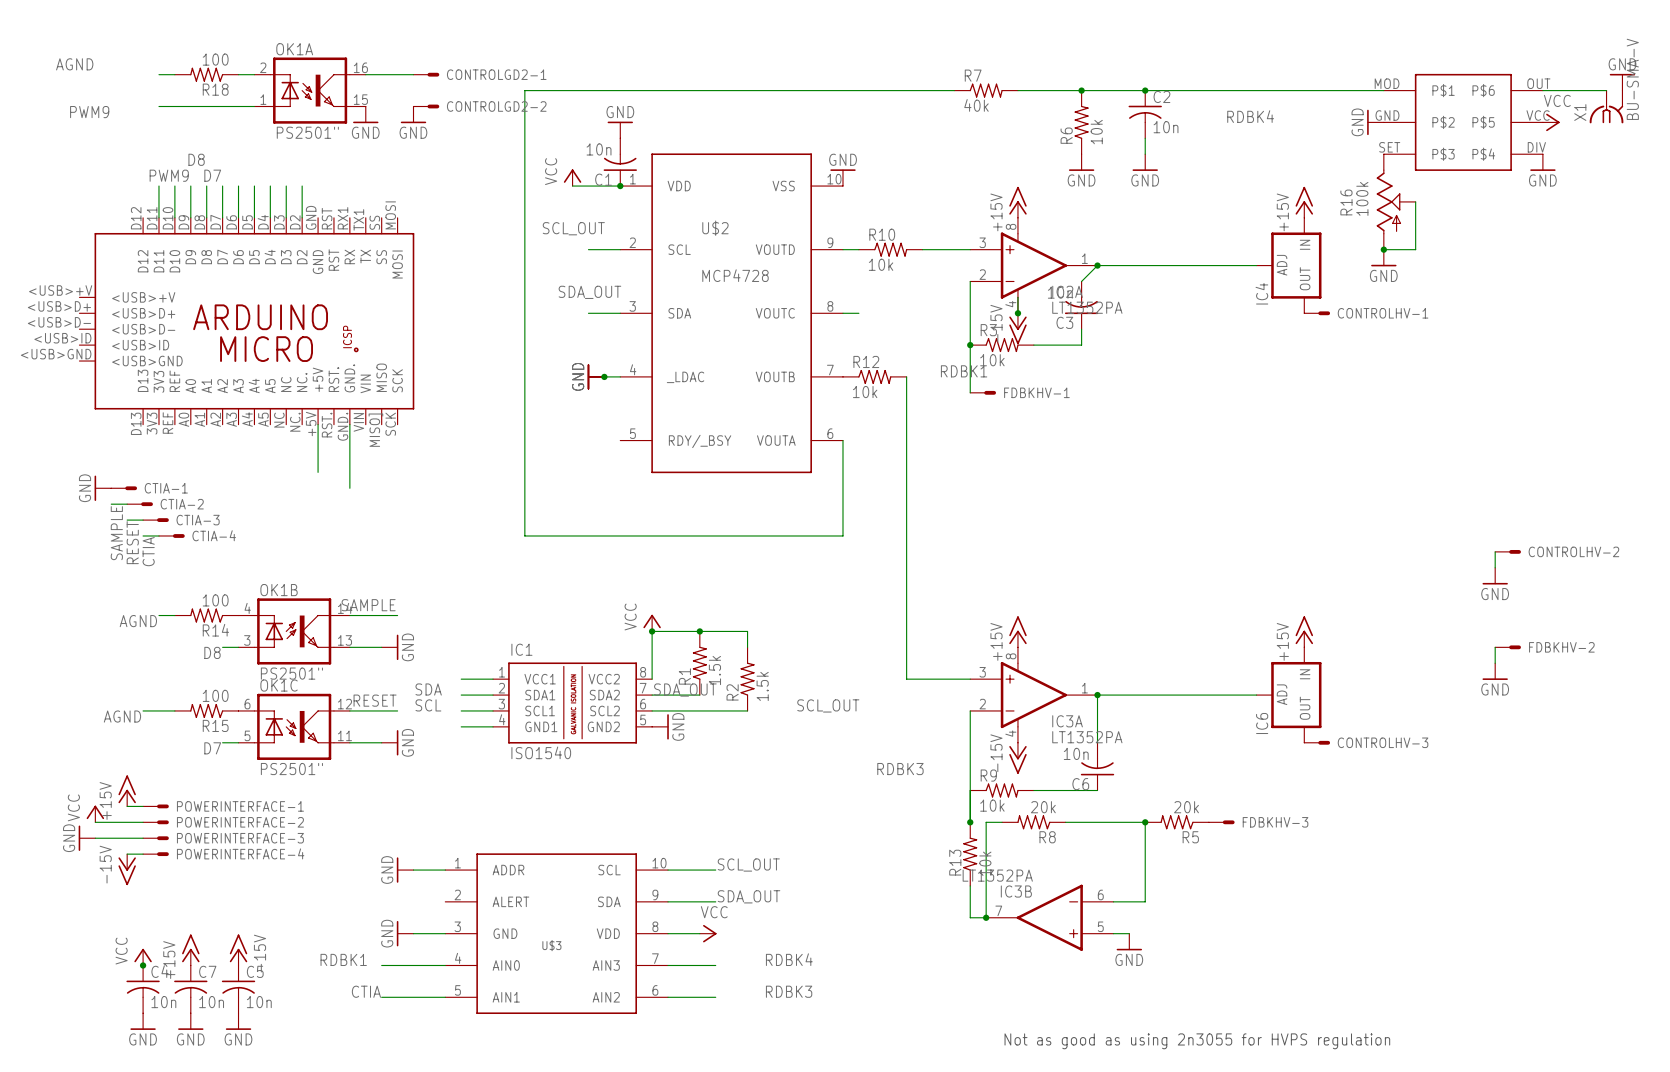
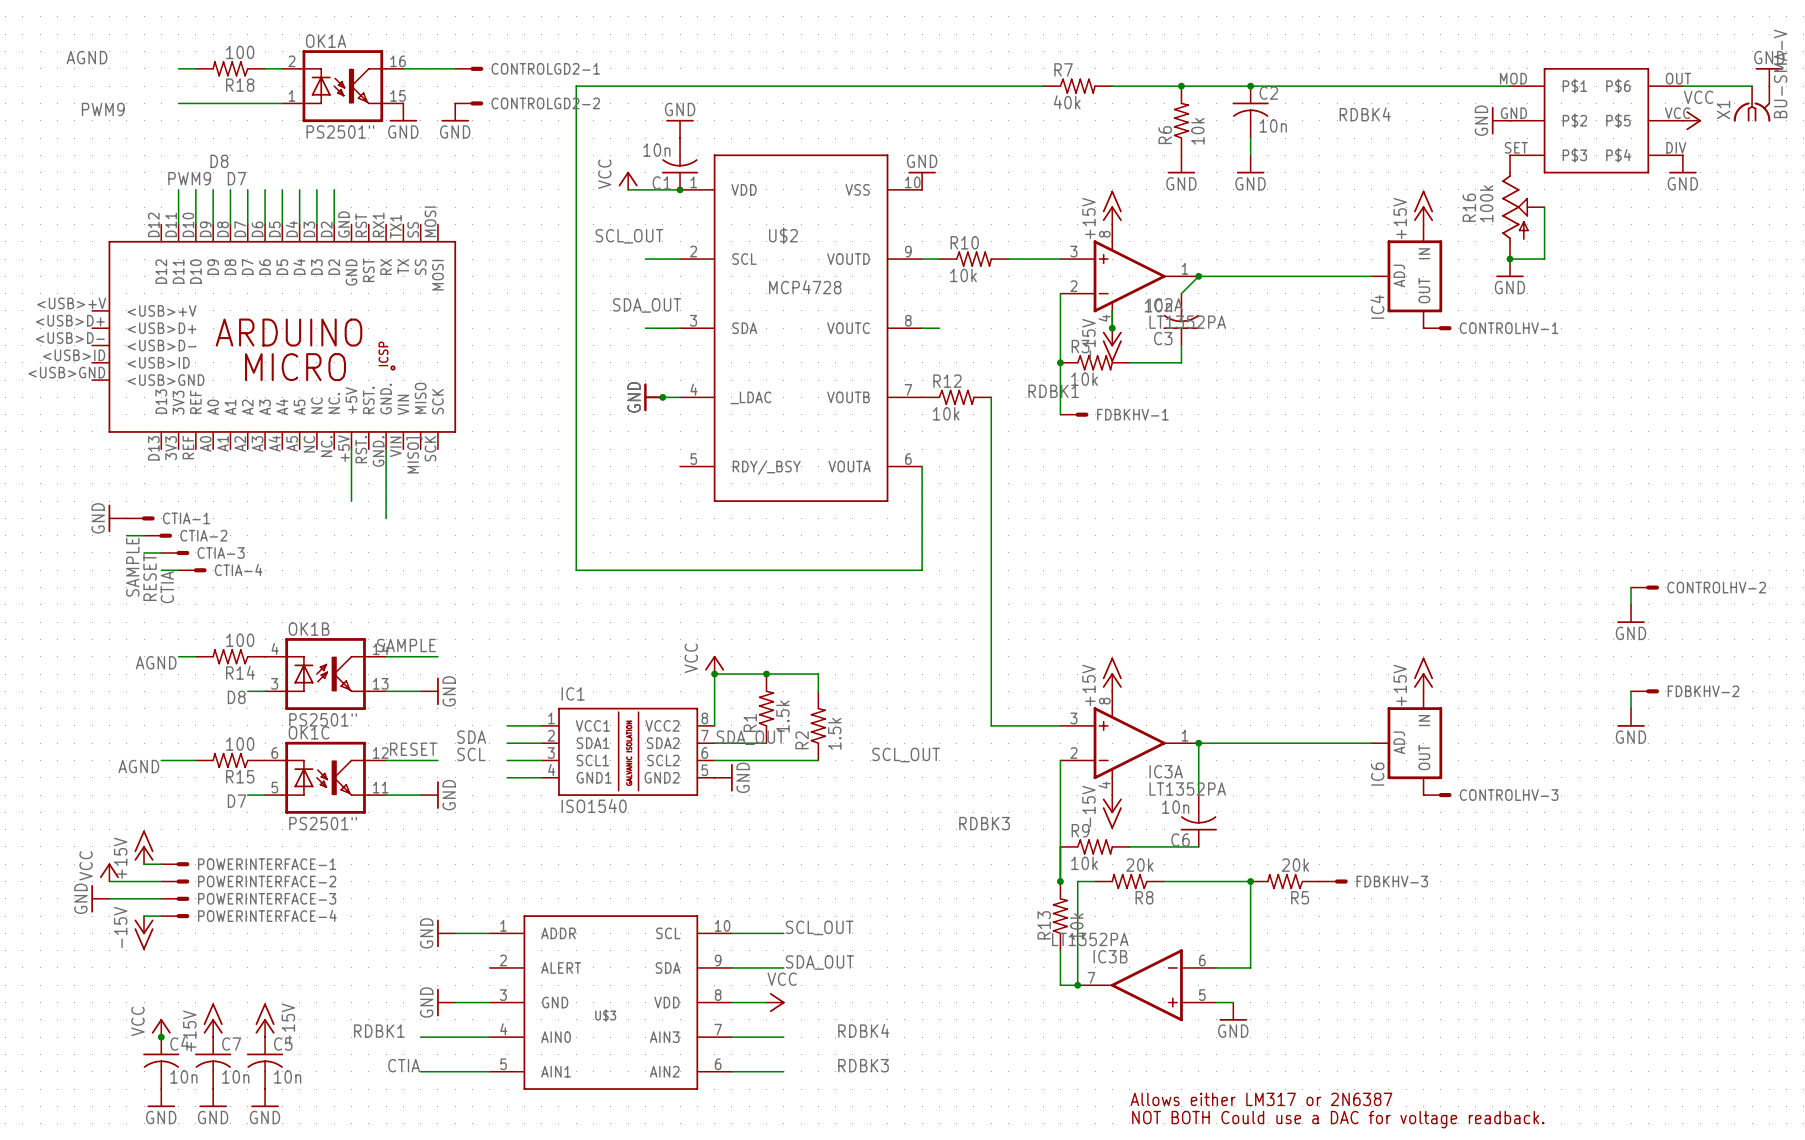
text: none -> Allows either LM317 or 2N6387 (1261, 1099)
text: Not as good as using 2n3055 for HVPS regulation (1197, 1041) -> none
text: none -> NOT BOTH Could use a DAC for voltage readback. (1338, 1119)

